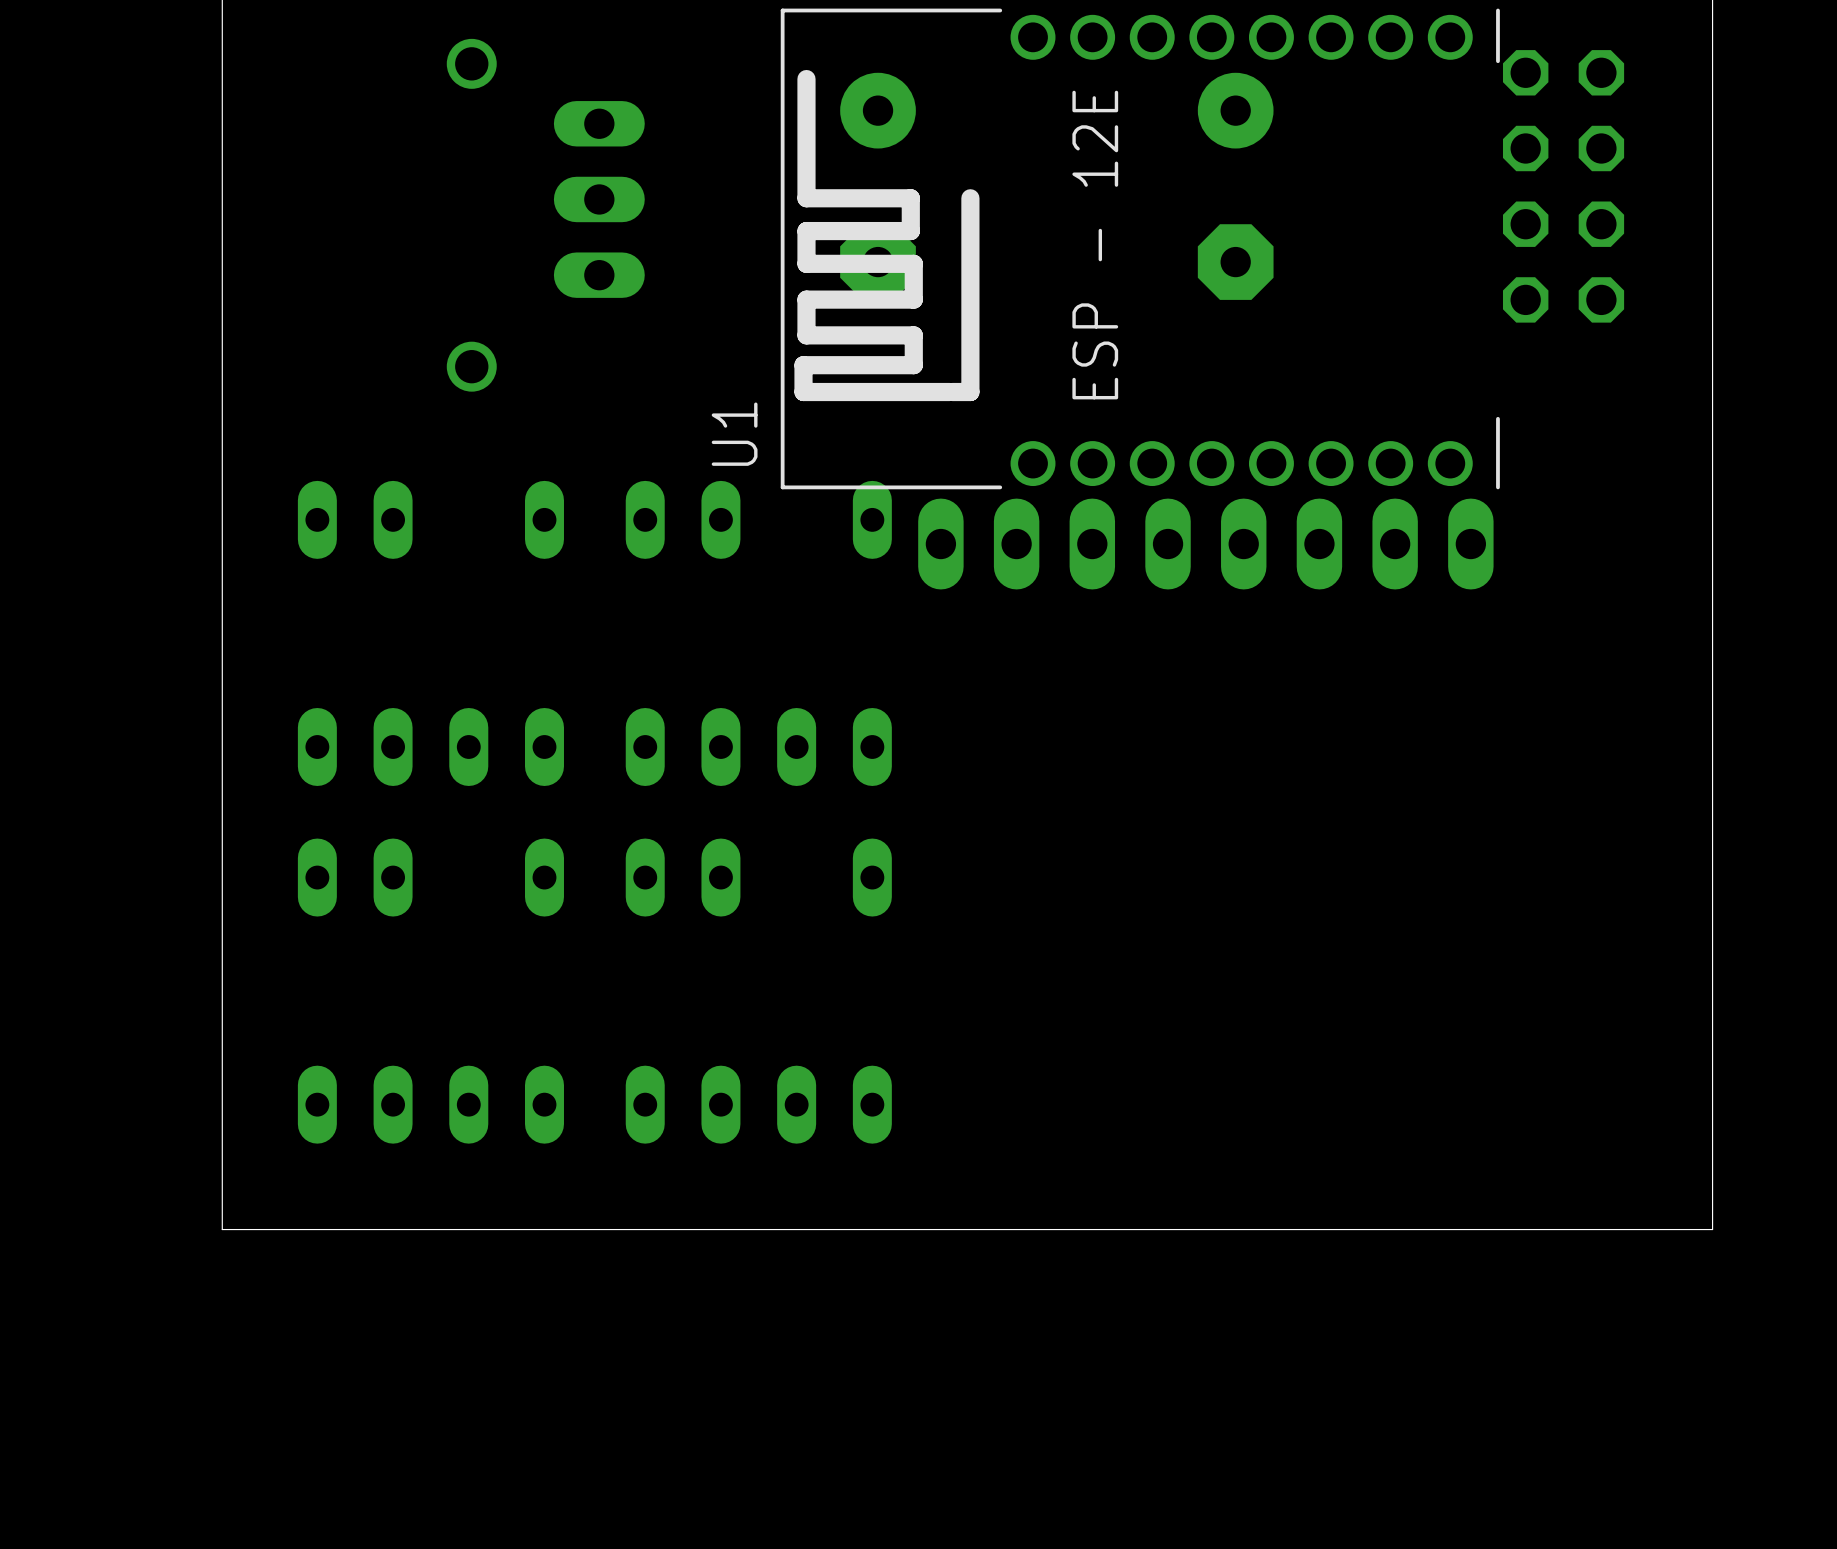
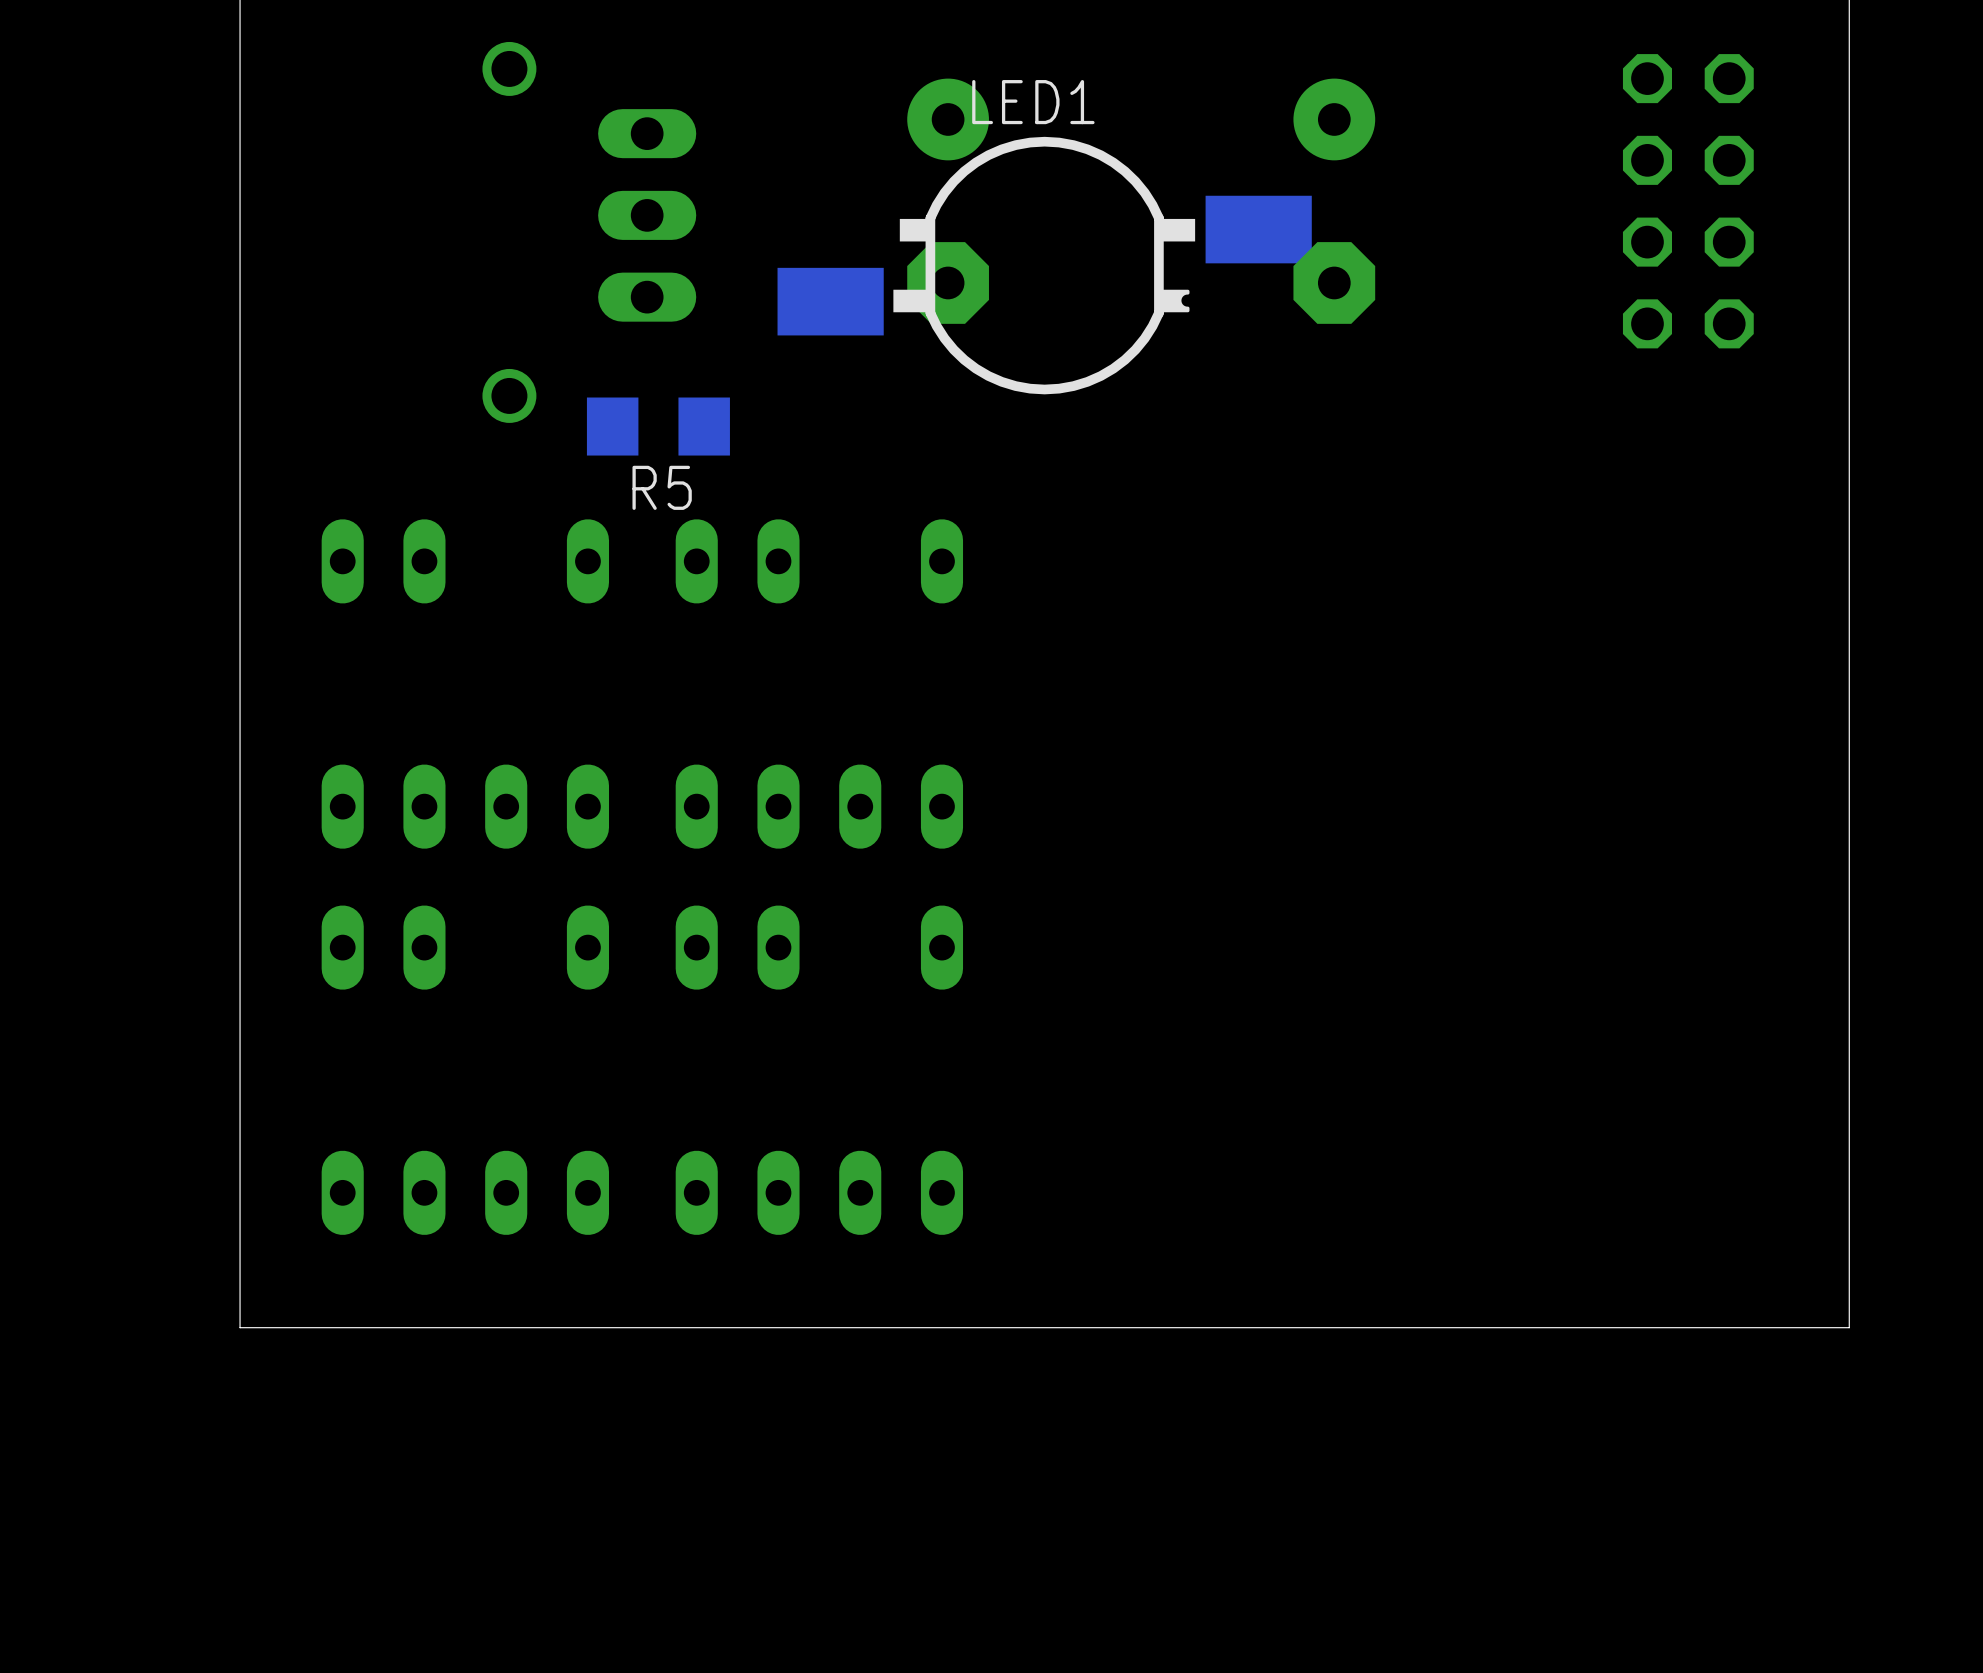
LED1: none -> (1044, 265)
U1: (1140, 248) -> none
R5: none -> (658, 426)
part: (1205, 544) -> none

